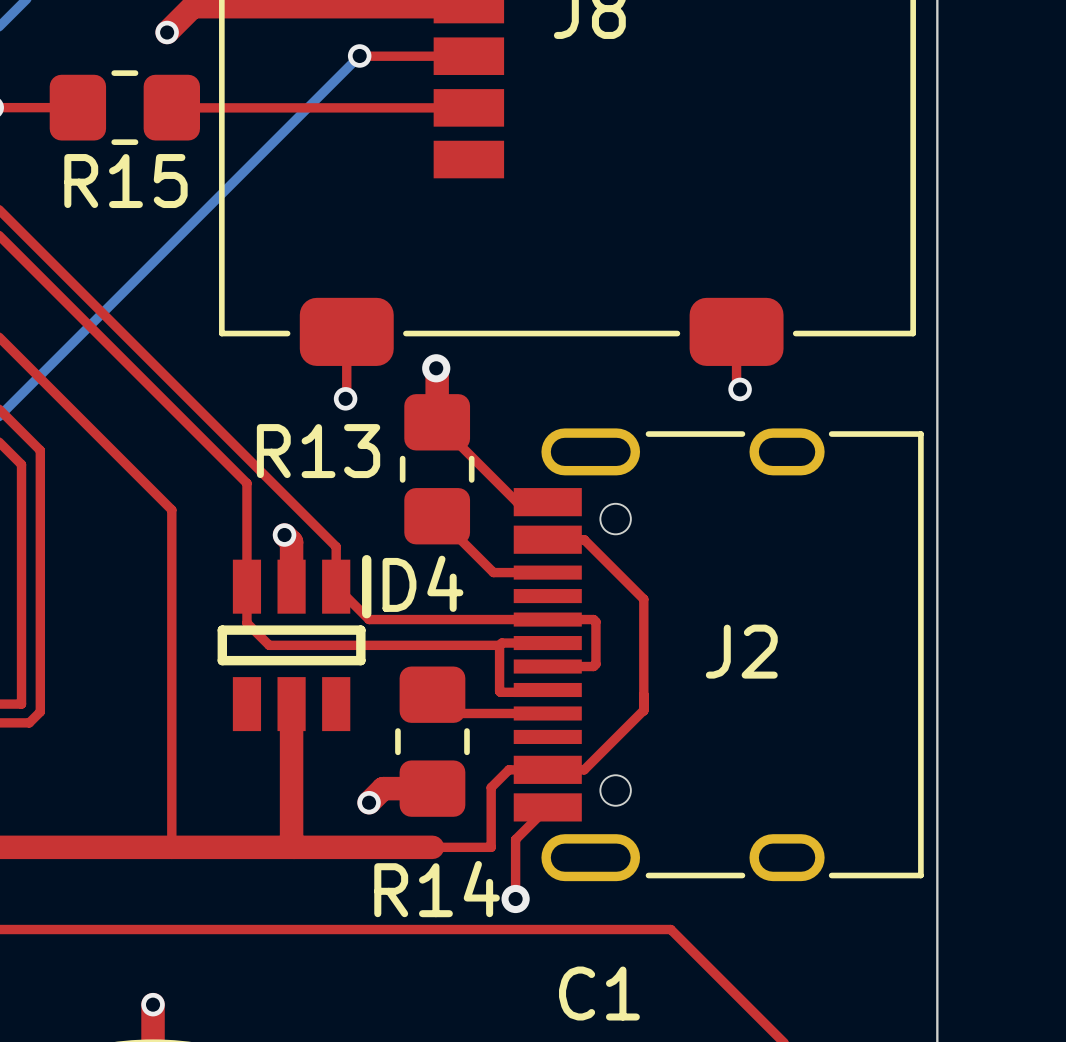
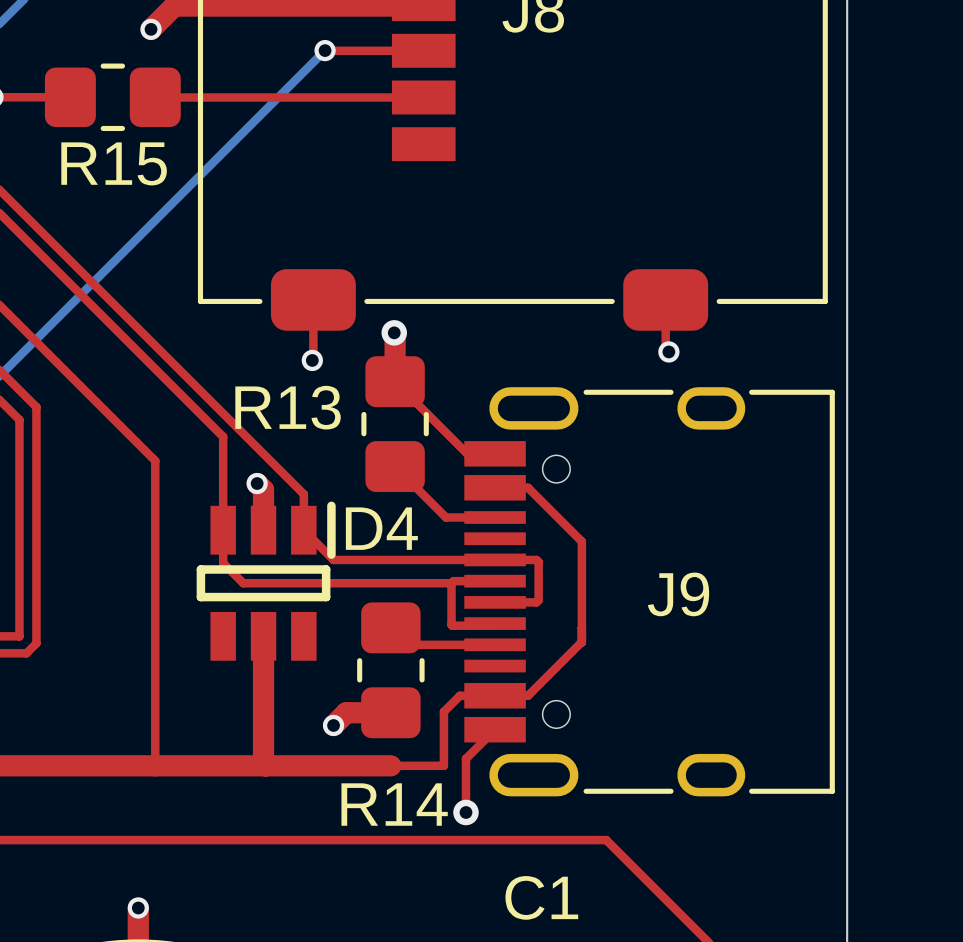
J2 name: J2 (741, 651) -> J9 (678, 594)

